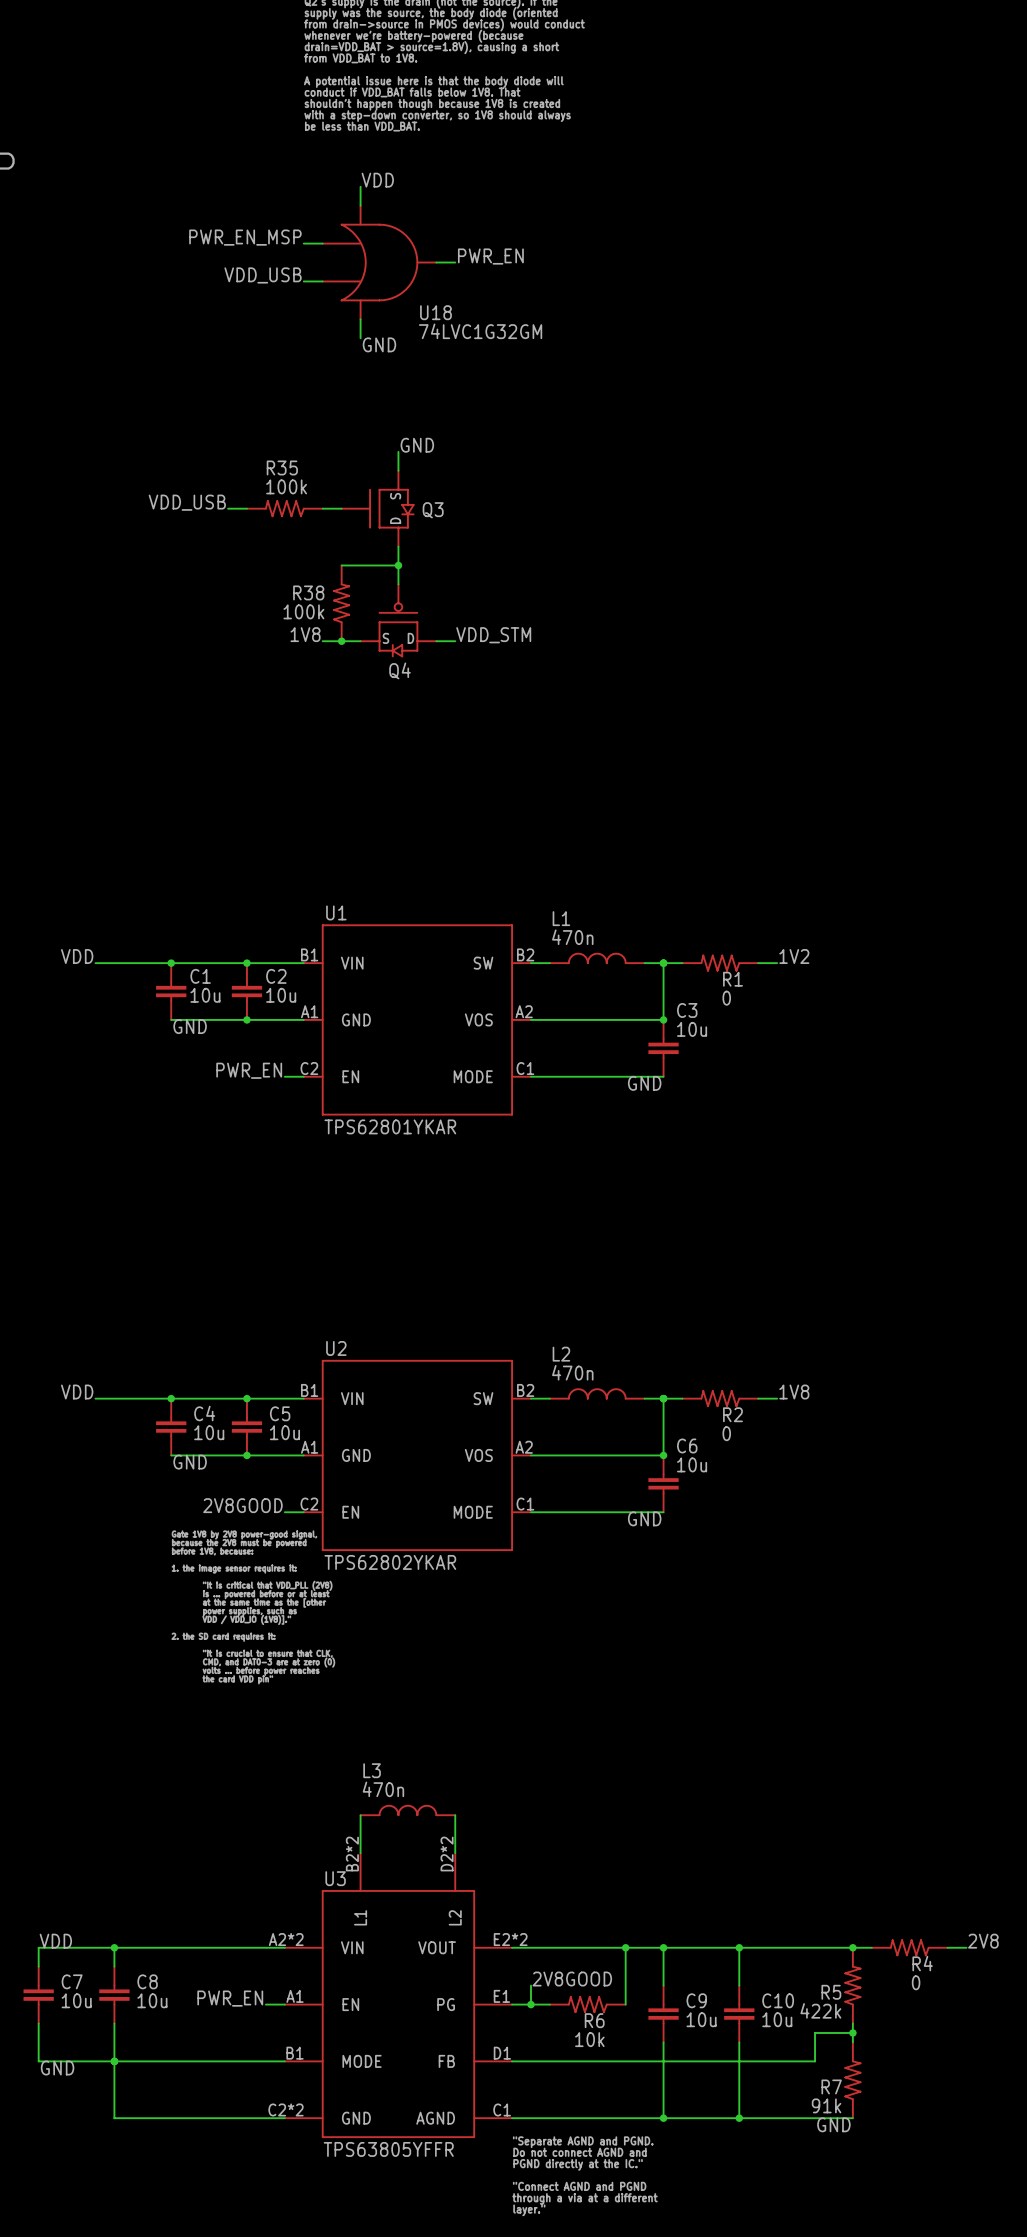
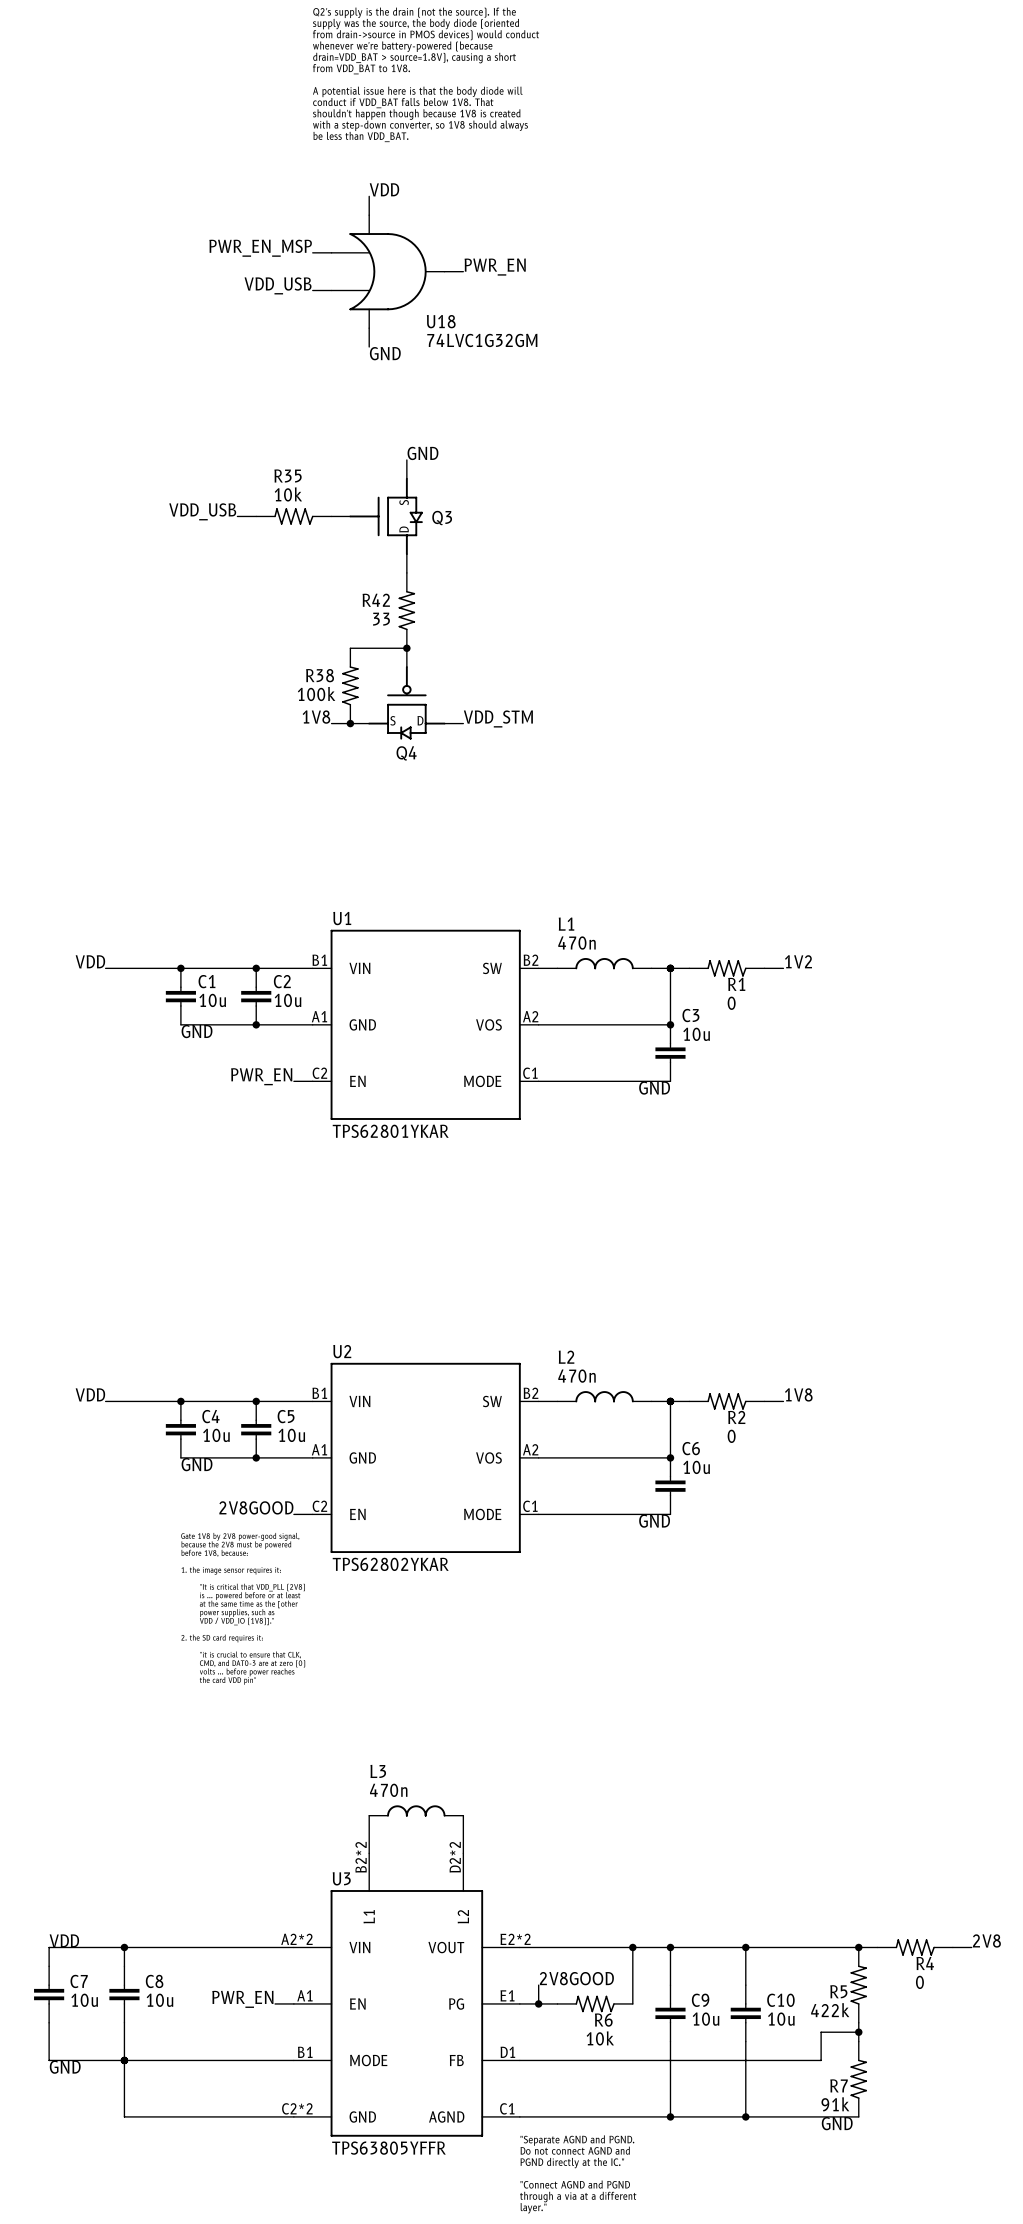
R35 value: 100k (286, 486) -> 10k (288, 494)
wire: (341, 565) (398, 565) (398, 584) -> none
junction: (398, 565) -> none
R38 position: (341, 603) -> (350, 685)
R42: none -> 33 (406, 610)
Q4 position: (398, 620) -> (406, 702)
label position: 1V8 (305, 634) -> 1V8 (316, 717)
label position: VDD_STM (493, 635) -> VDD_STM (498, 718)
wire: (322, 641) (341, 641) -> none
junction: (341, 641) -> none
wire: none -> (369, 648) (406, 648) (406, 667)
junction: none -> (406, 648)
wire: (436, 641) (455, 641) -> (444, 723) (463, 723)
wire: none -> (331, 723) (369, 723)
junction: none -> (350, 723)

